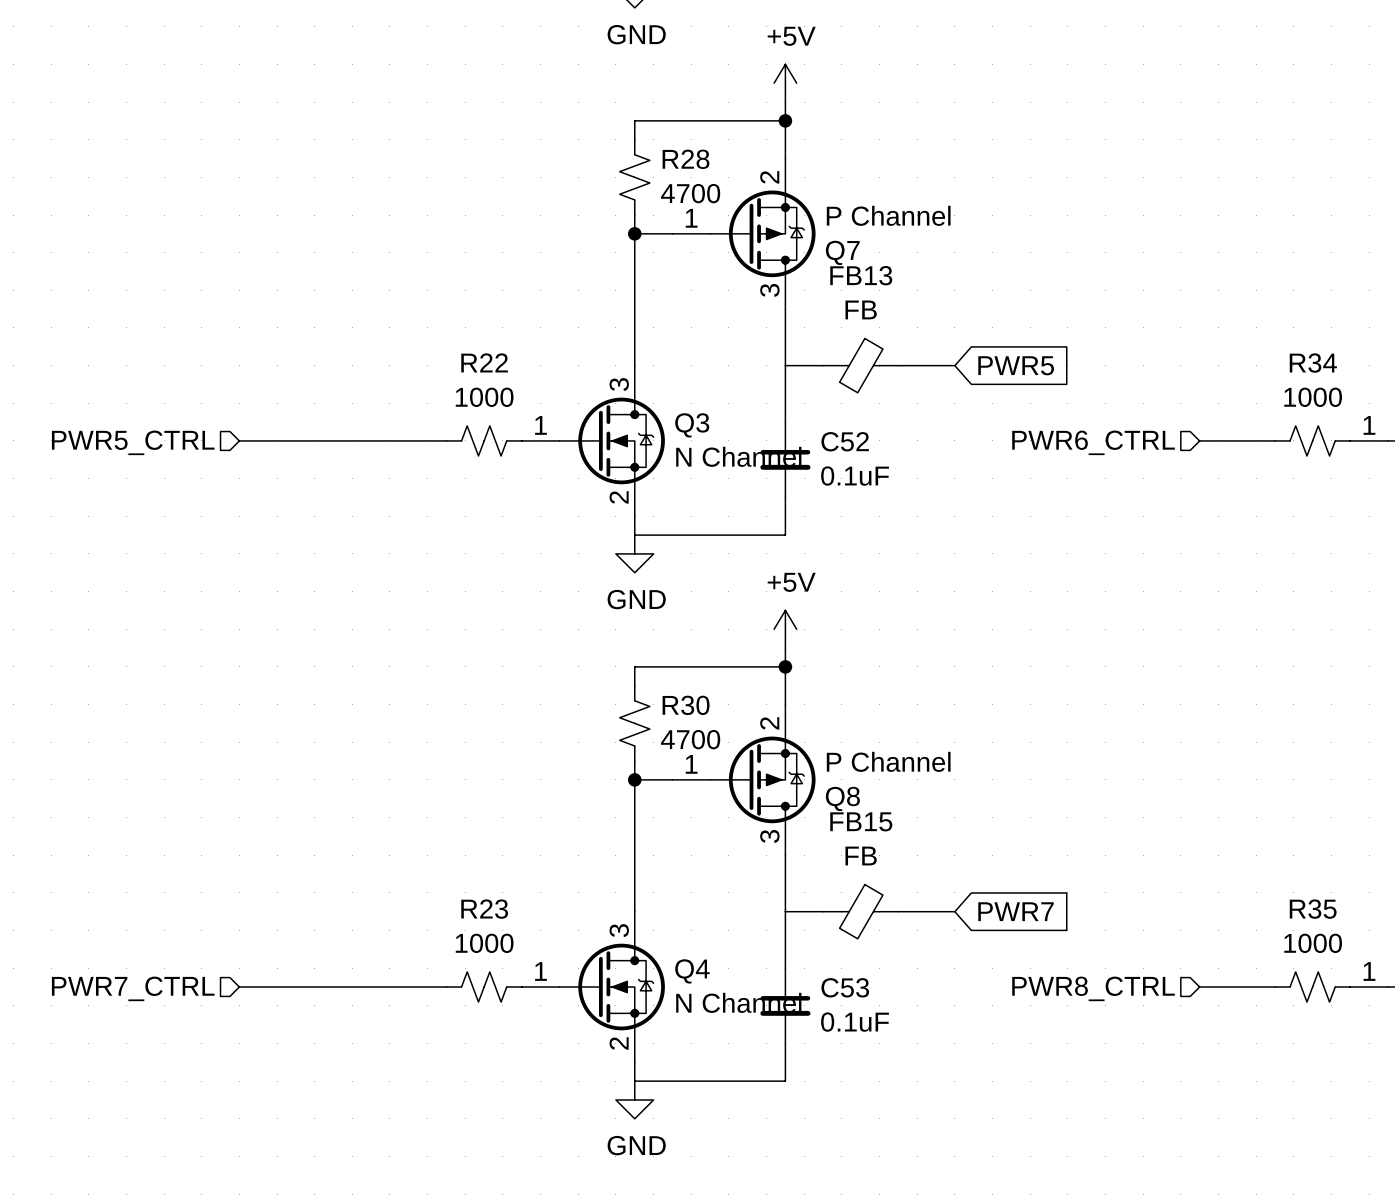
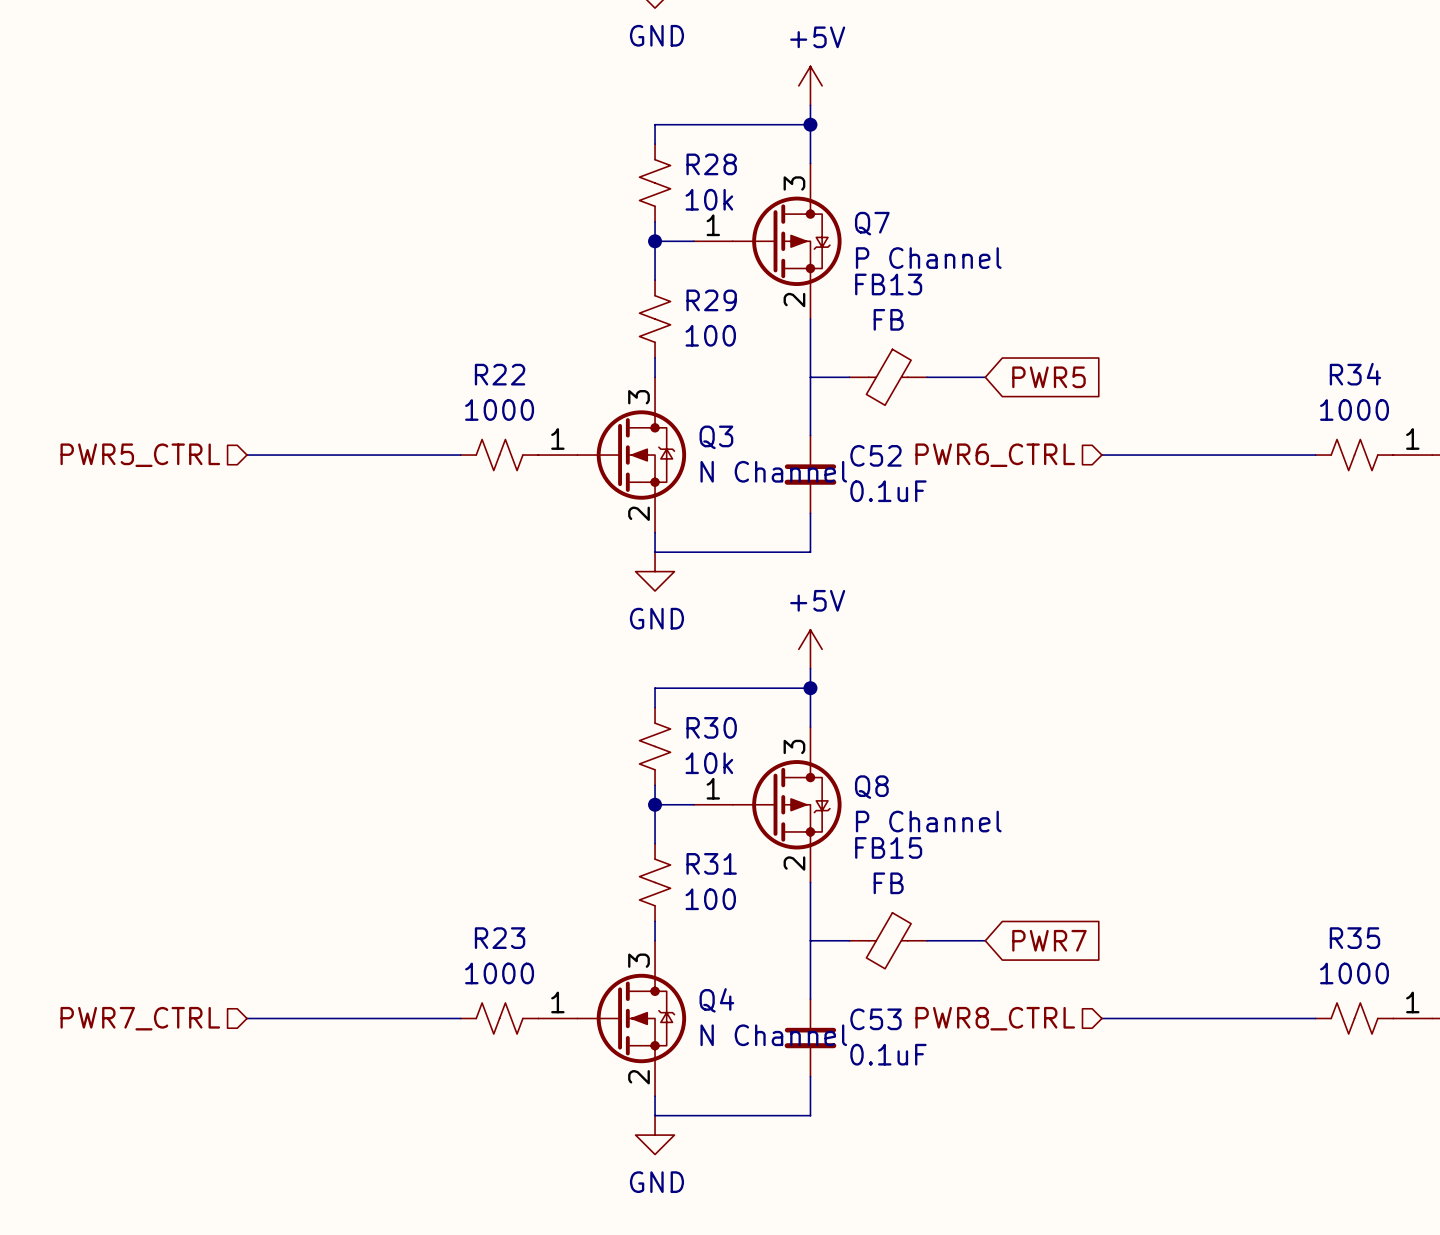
R28 value: 4700 (690, 193) -> 10k (709, 199)
Q7 flip: as is (762, 233) -> up-down (787, 241)
wire: (634, 271) (634, 346) -> none
R29: none -> 100 (655, 319)
wire: none -> (1101, 455) (1237, 455)
hierarchical label position: PWR6_CTRL (1093, 442) -> PWR6_CTRL (995, 455)
R30 value: 4700 (690, 739) -> 10k (709, 763)
Q8 flip: as is (762, 779) -> up-down (787, 804)
wire: (634, 817) (634, 892) -> none
R31: none -> 100 (655, 882)
wire: none -> (1101, 1018) (1237, 1018)
hierarchical label position: PWR8_CTRL (1093, 988) -> PWR8_CTRL (995, 1018)

